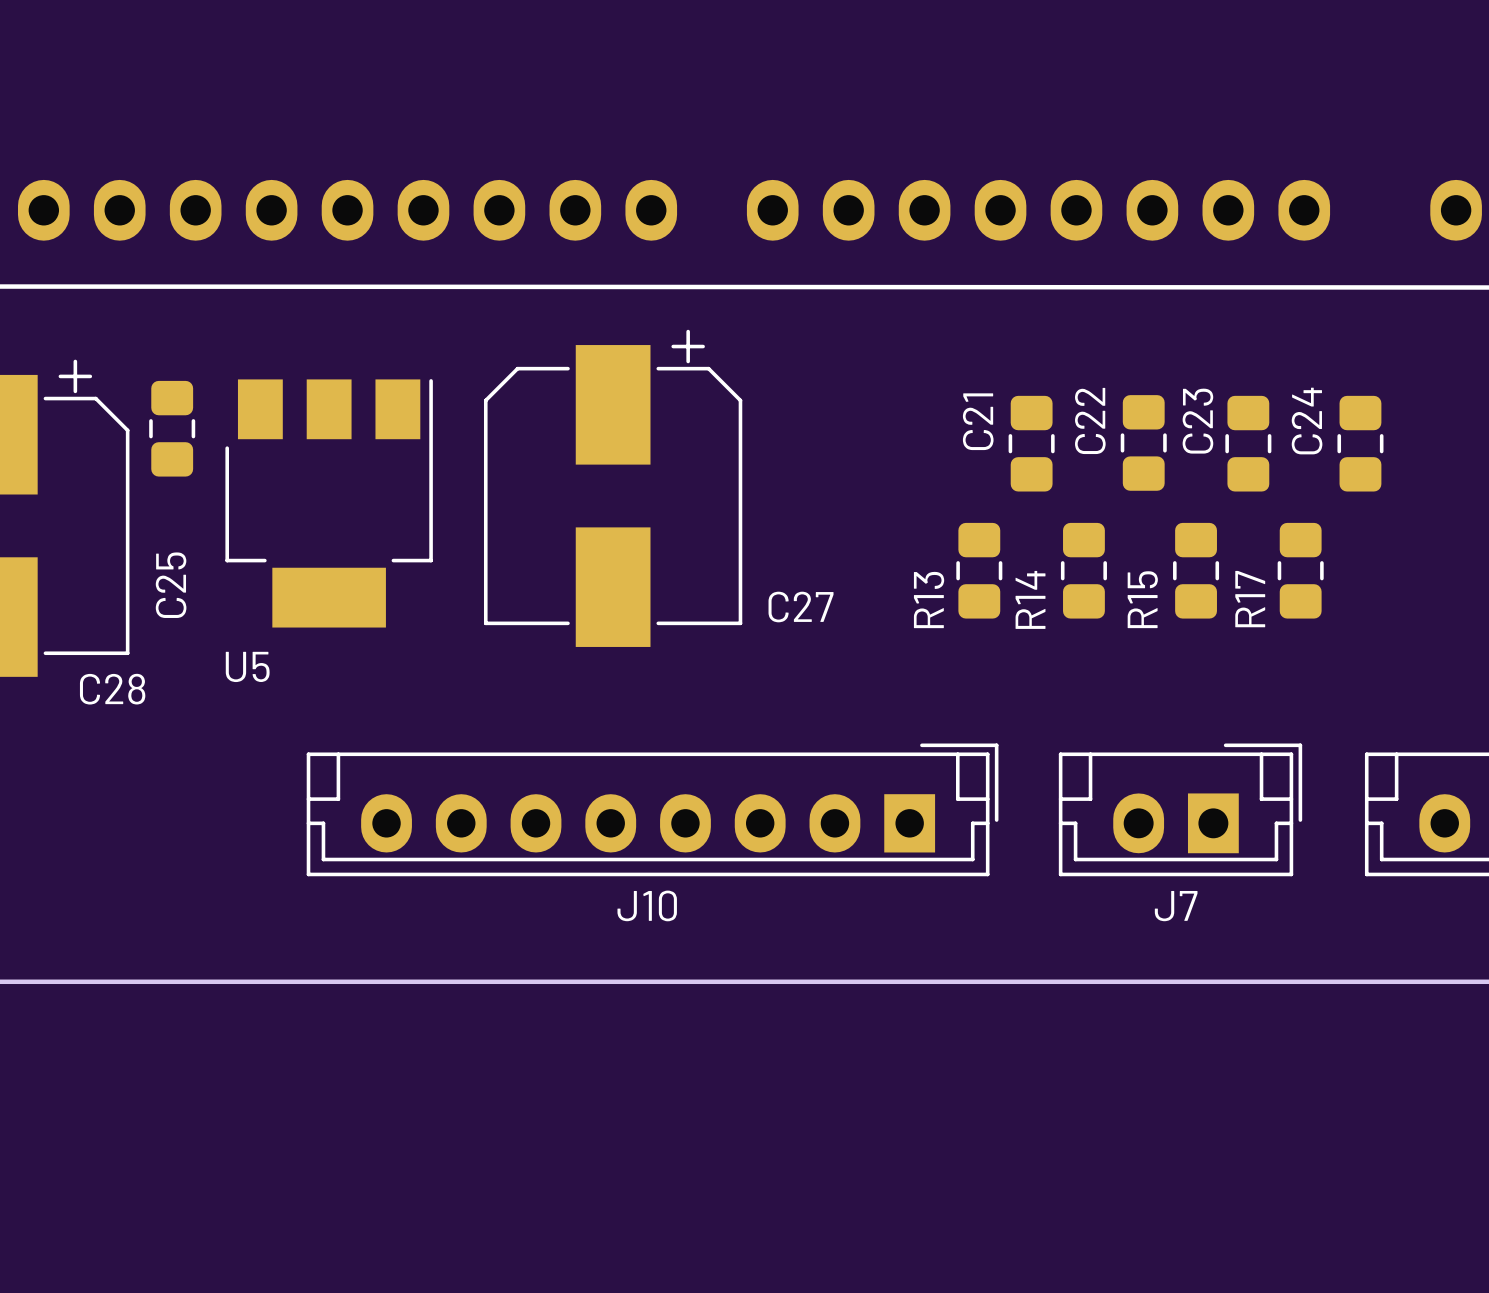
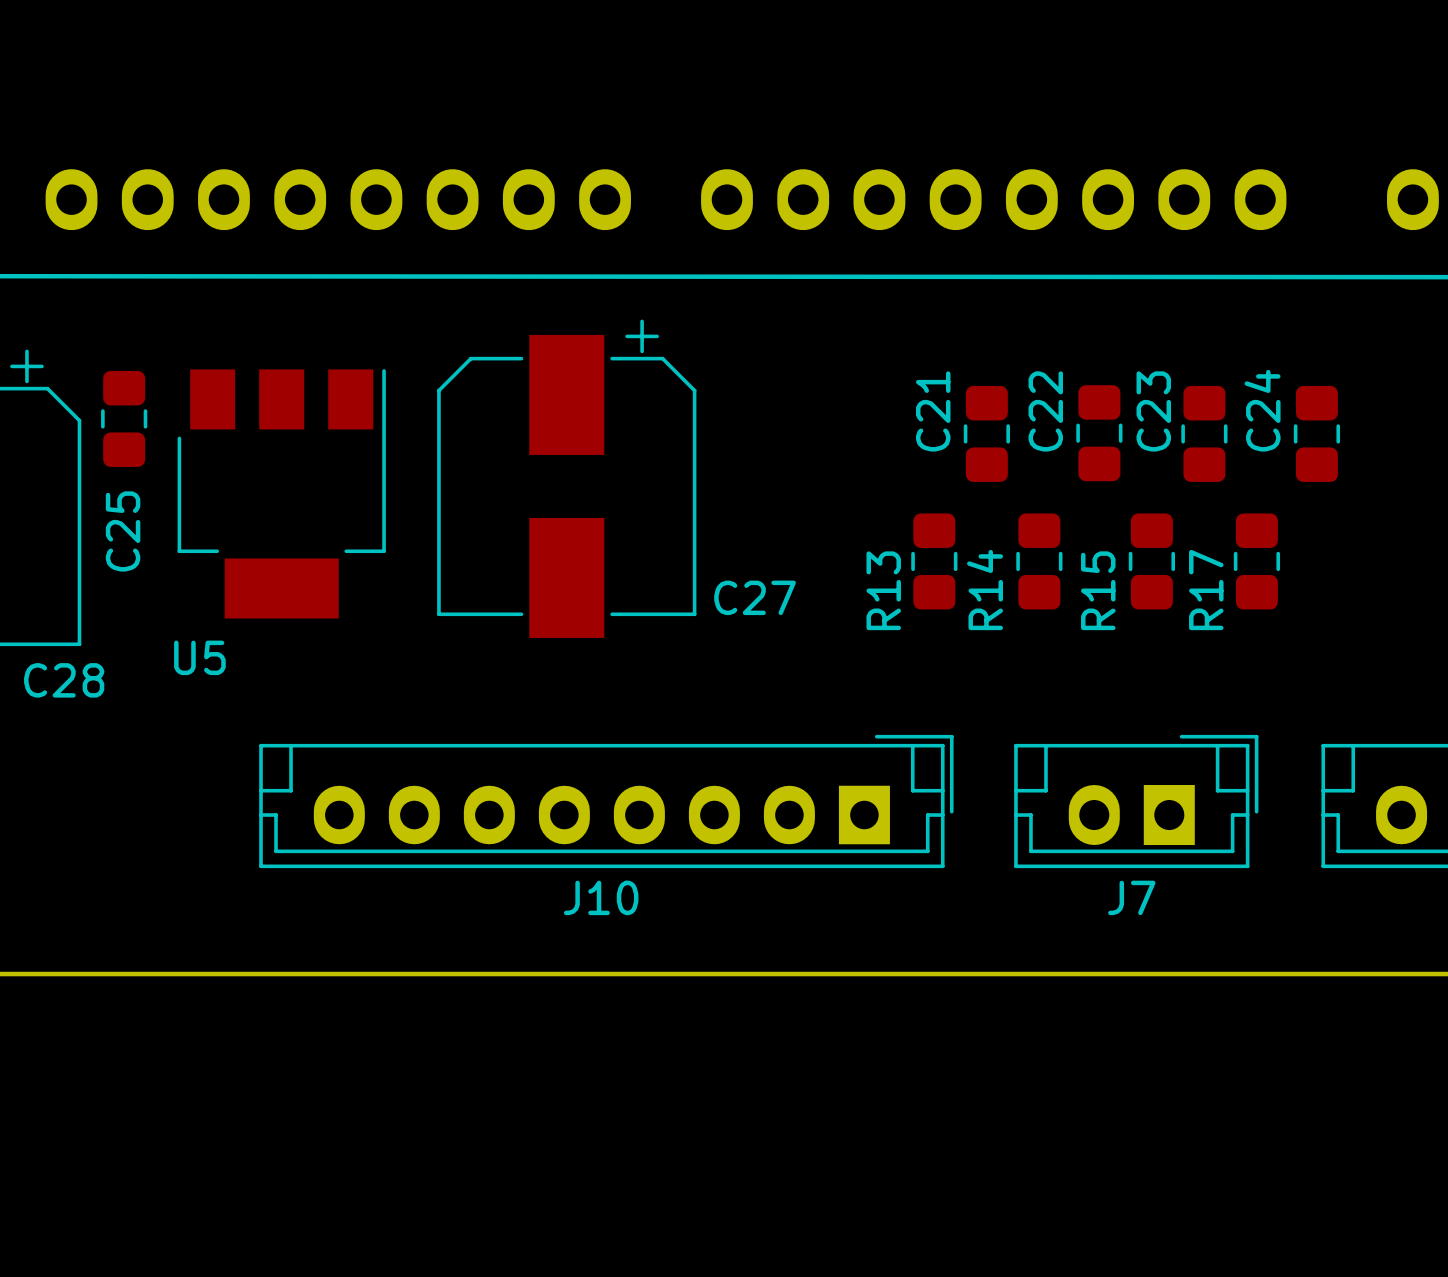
C25 name position: C25 (171, 585) -> C25 (123, 531)

